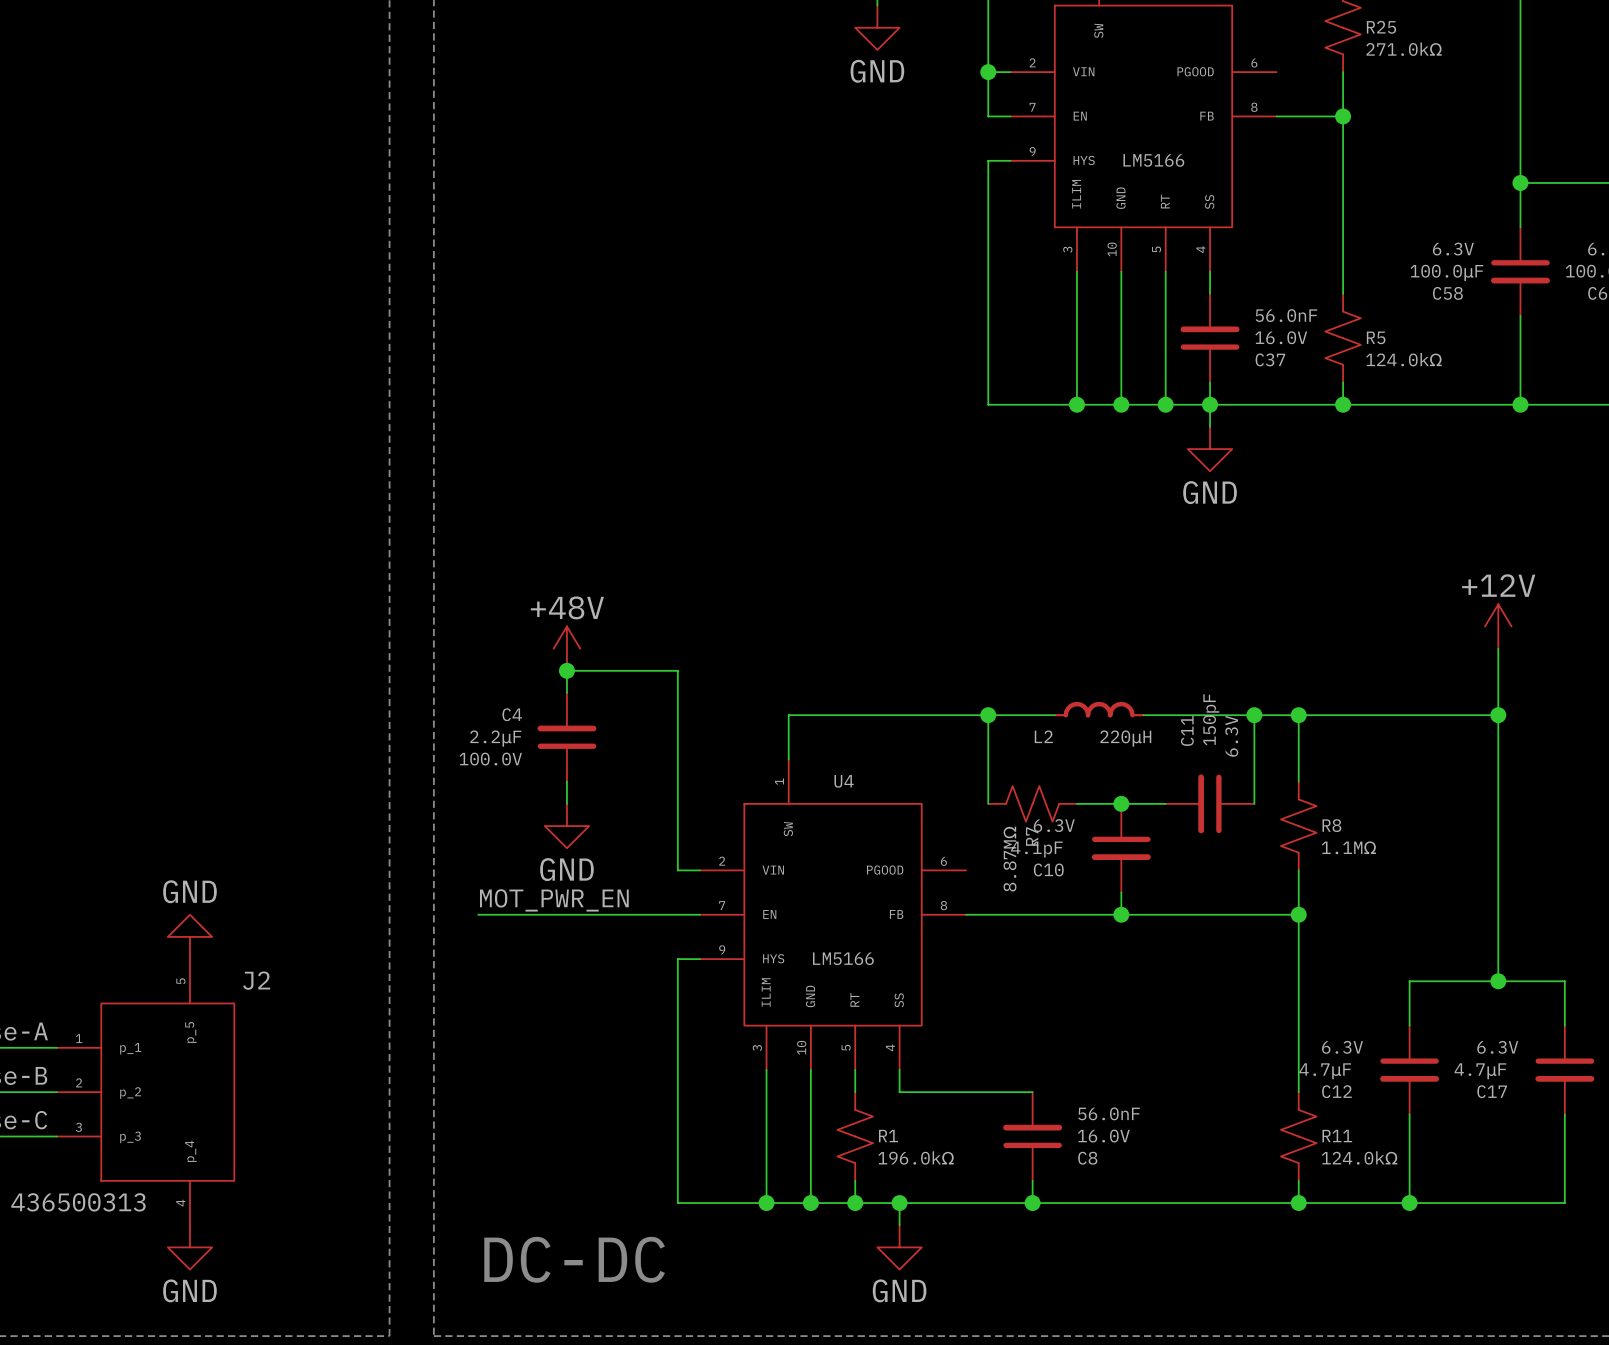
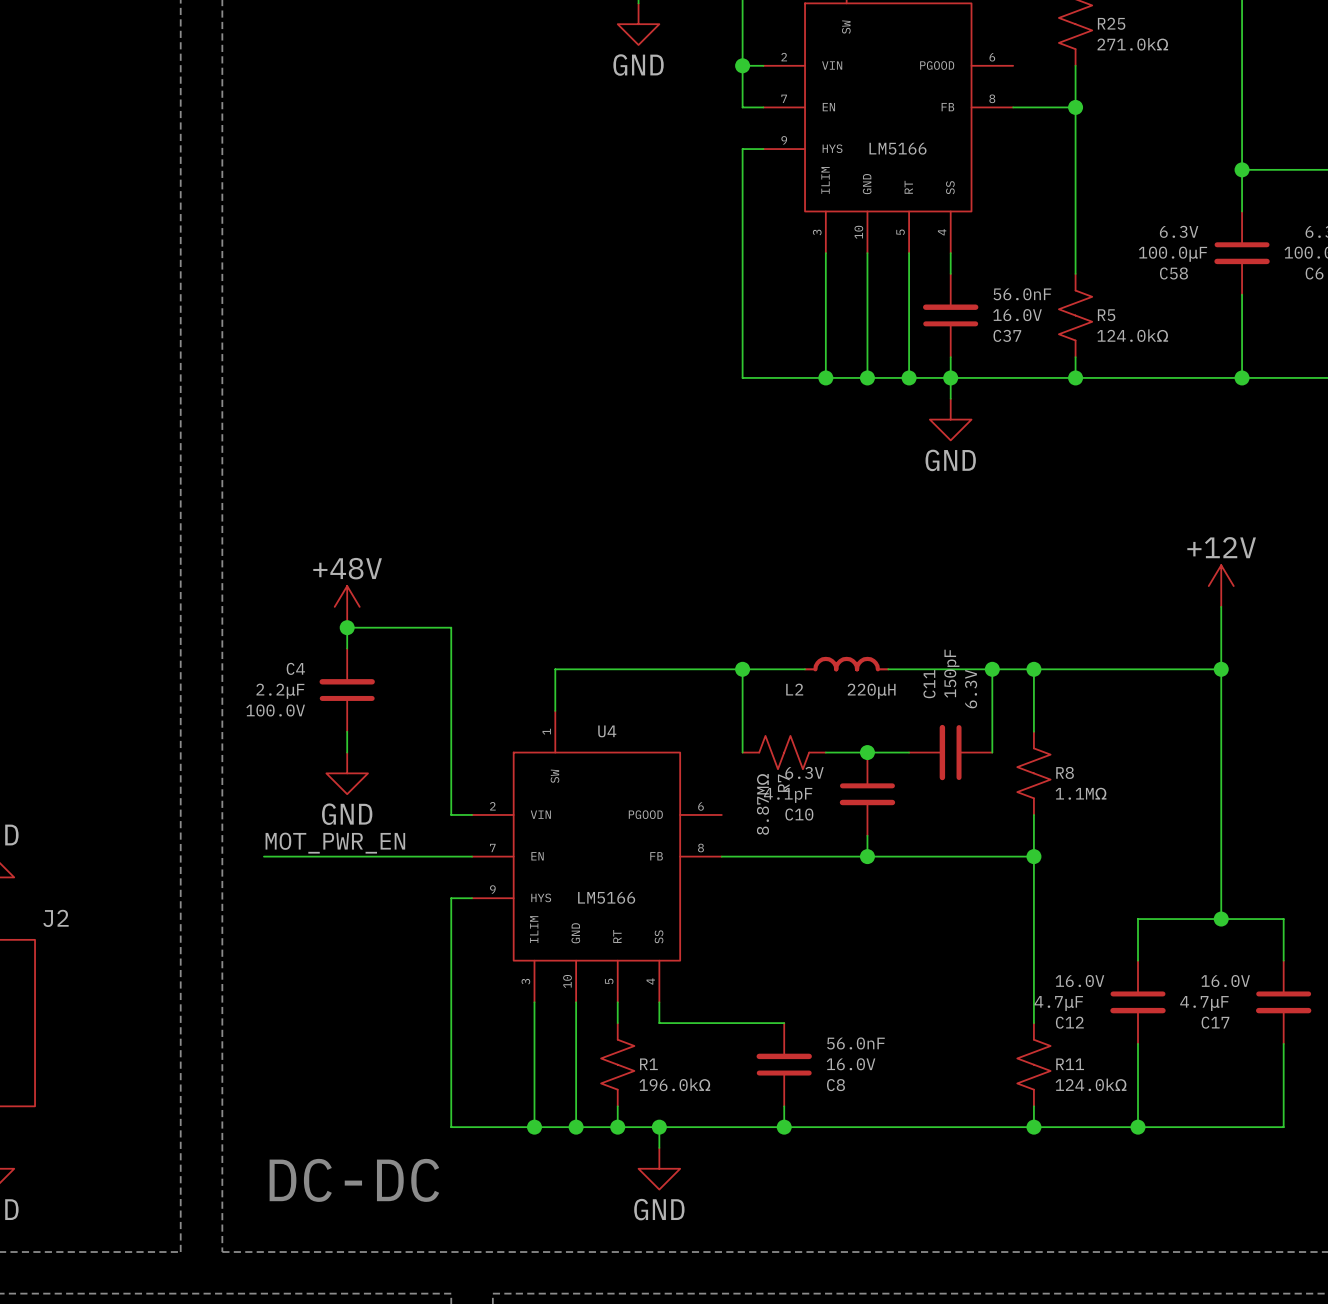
C12 text: 6.3V (1342, 1047) -> 16.0V (1079, 981)
C17 text: 6.3V (1497, 1047) -> 16.0V (1225, 981)

